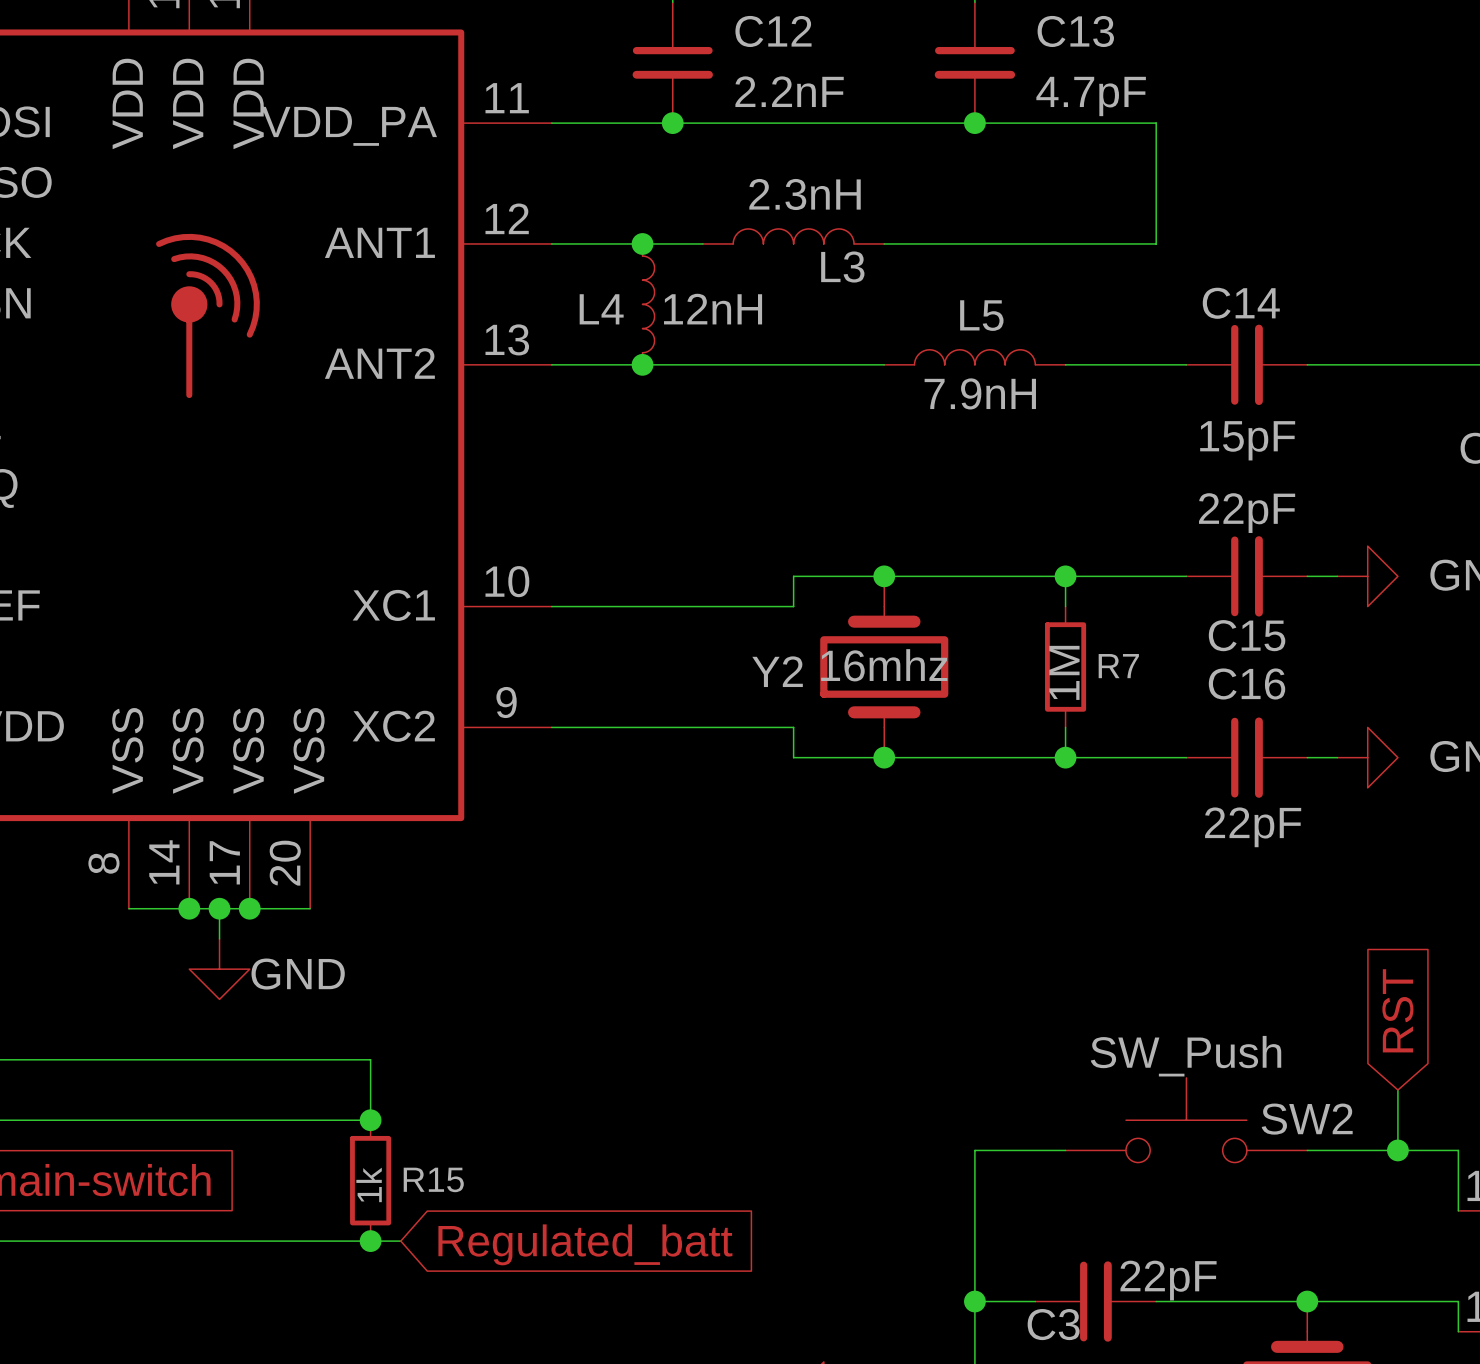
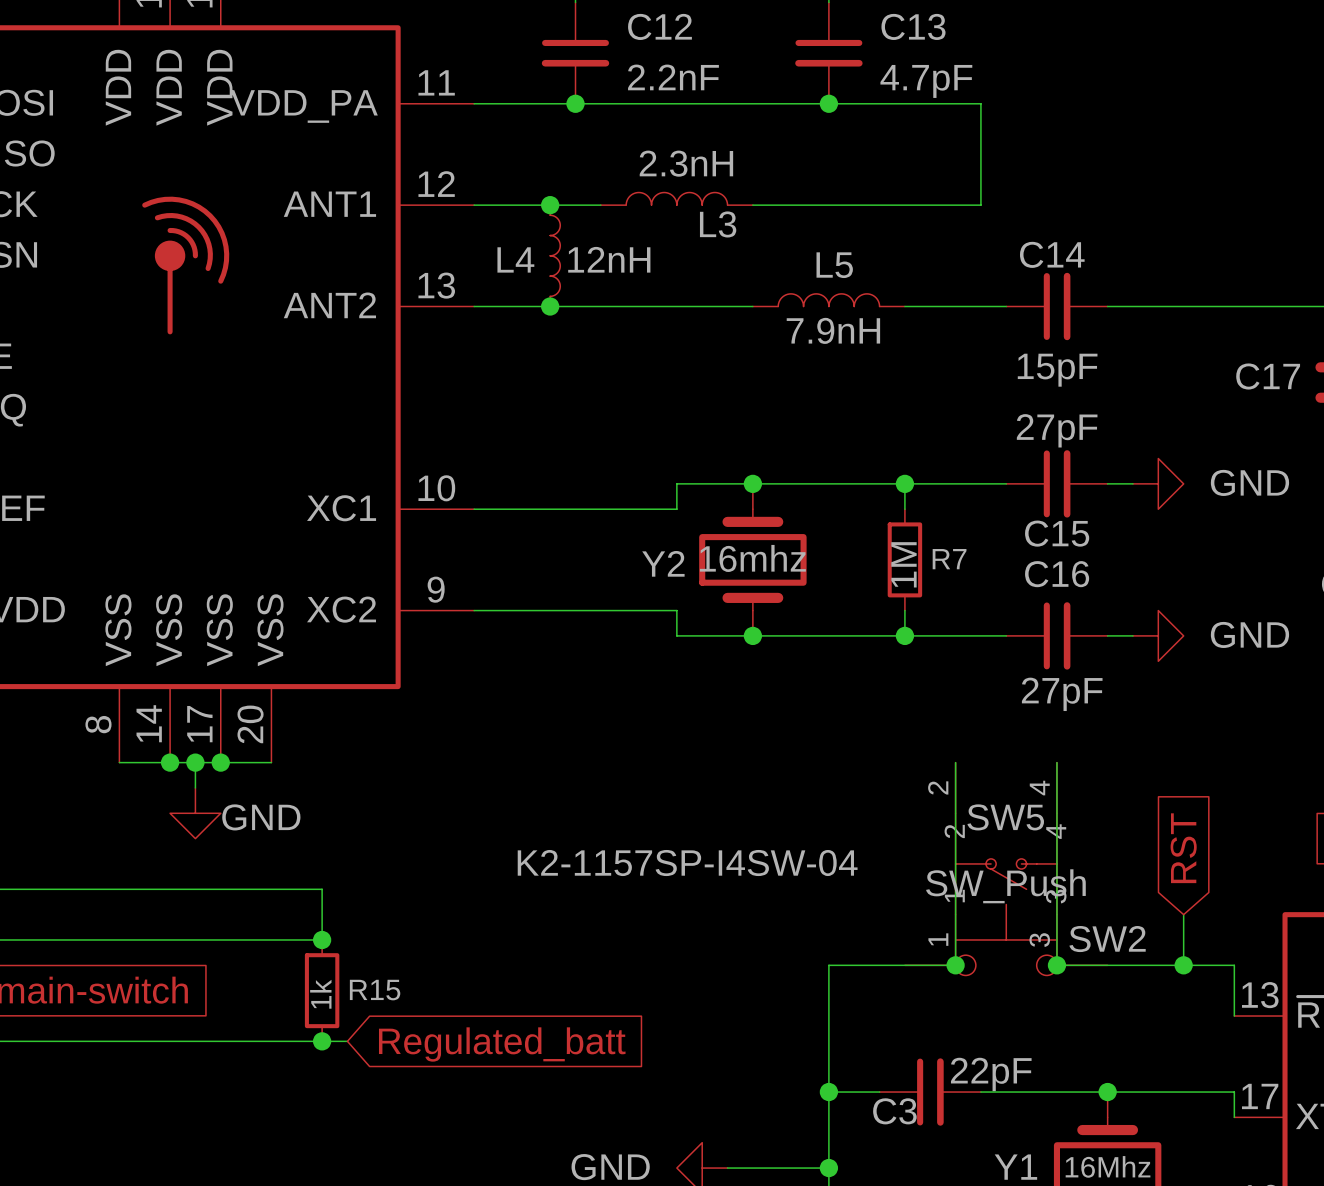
C15 value: 22pF (1247, 513) -> 27pF (1057, 430)
C16 value: 22pF (1253, 827) -> 27pF (1062, 694)
wire: none -> (955, 762) (955, 965) (904, 965)
wire: none -> (1056, 762) (1056, 965) (1107, 965)
SW5: none -> K2-1157SP-I4SW-04 (1006, 863)
junction: none -> (955, 965)
junction: none -> (1056, 965)

